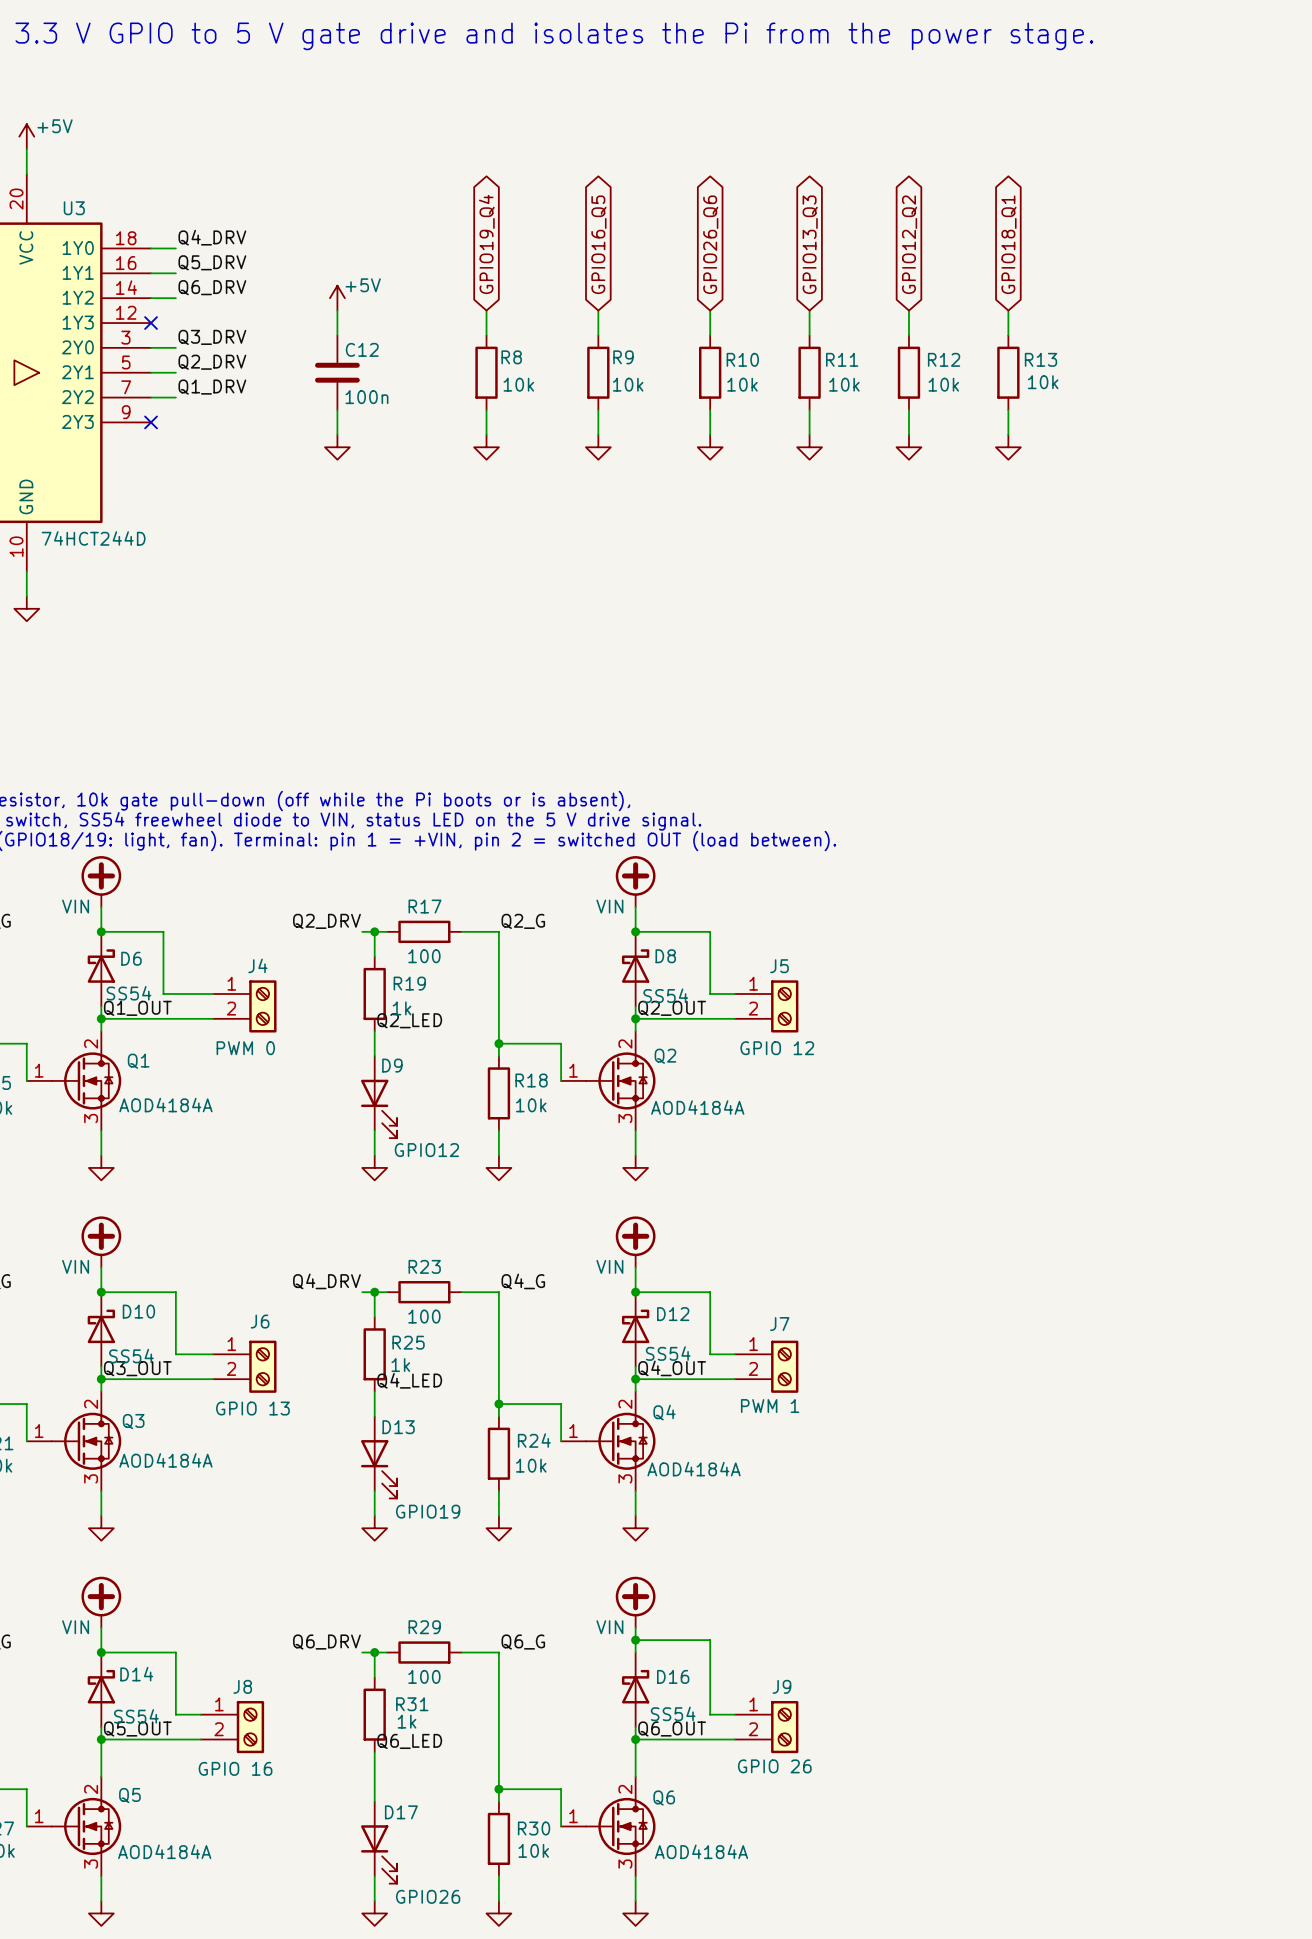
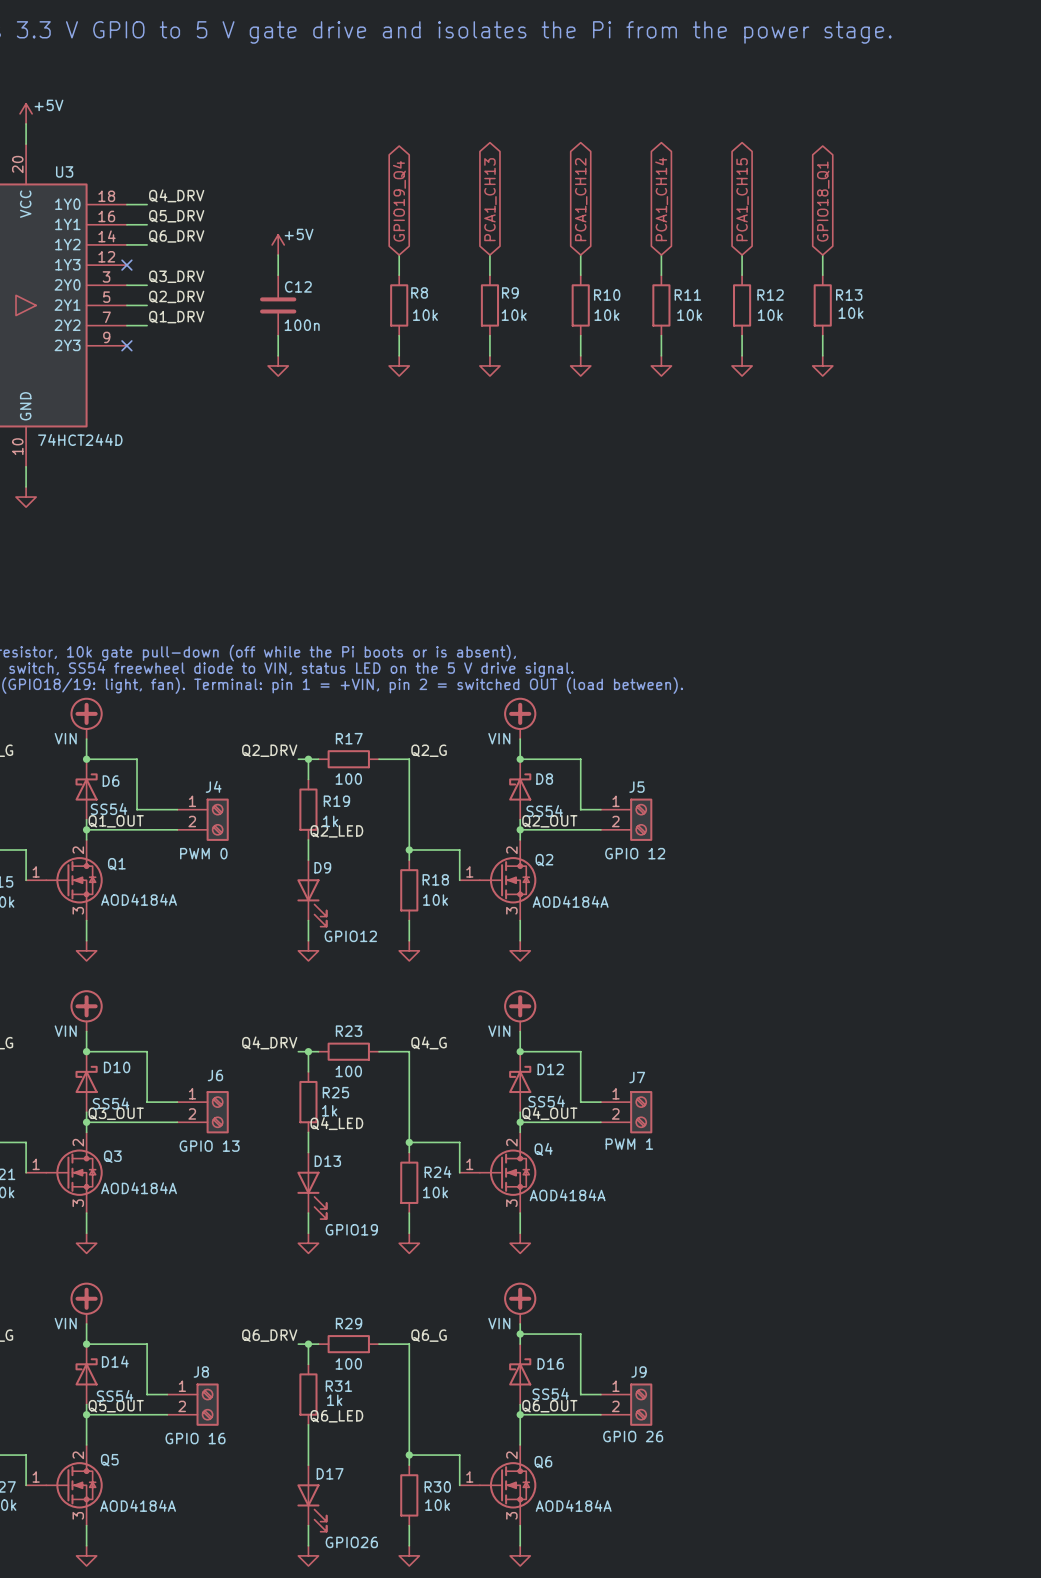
global label: GPIO16_Q5 (598, 244) -> PCA1_CH13 (490, 199)
global label: GPIO26_Q6 (710, 244) -> PCA1_CH12 (581, 199)
global label: GPIO13_Q3 (810, 244) -> PCA1_CH14 (661, 199)
global label: GPIO12_Q2 (909, 244) -> PCA1_CH15 (742, 199)

